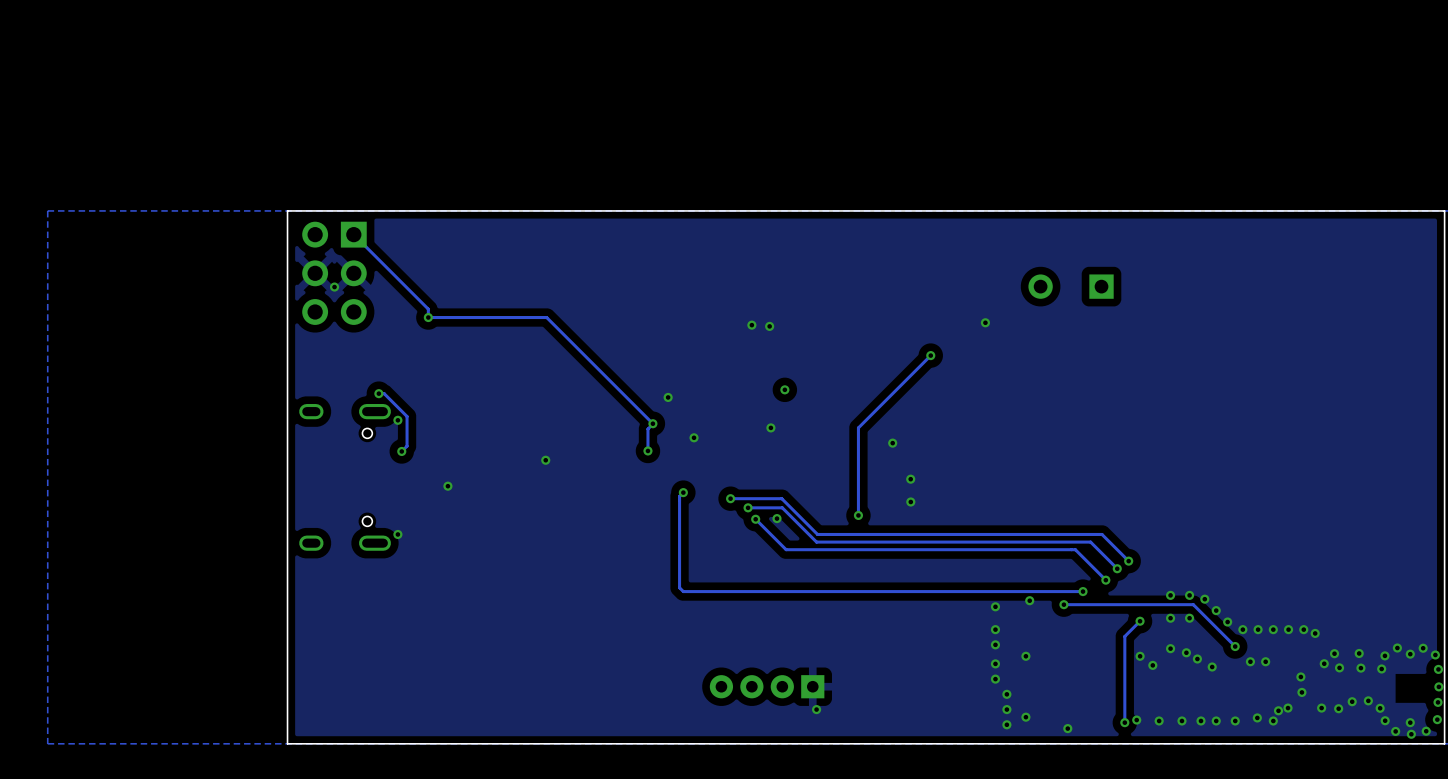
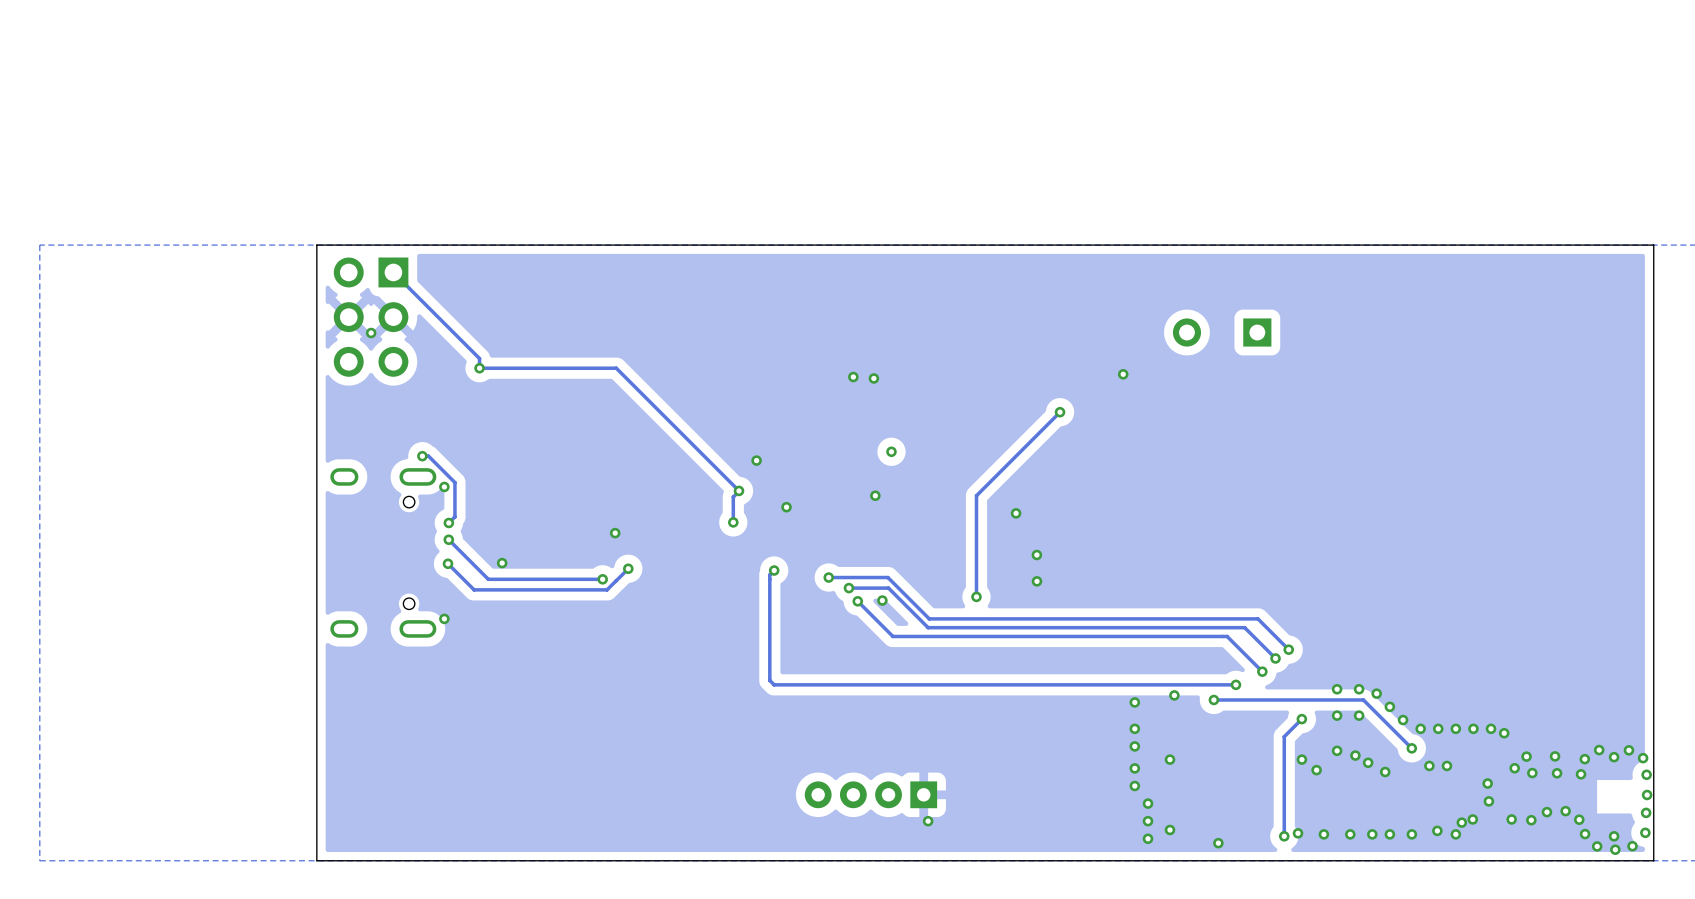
track: none -> (448, 539) (488, 579) (602, 579)
via: none -> (448, 539)
track: none -> (448, 563) (474, 589) (607, 589) (628, 568)
via: none -> (448, 563)
via: none -> (628, 568)
via: none -> (602, 579)

